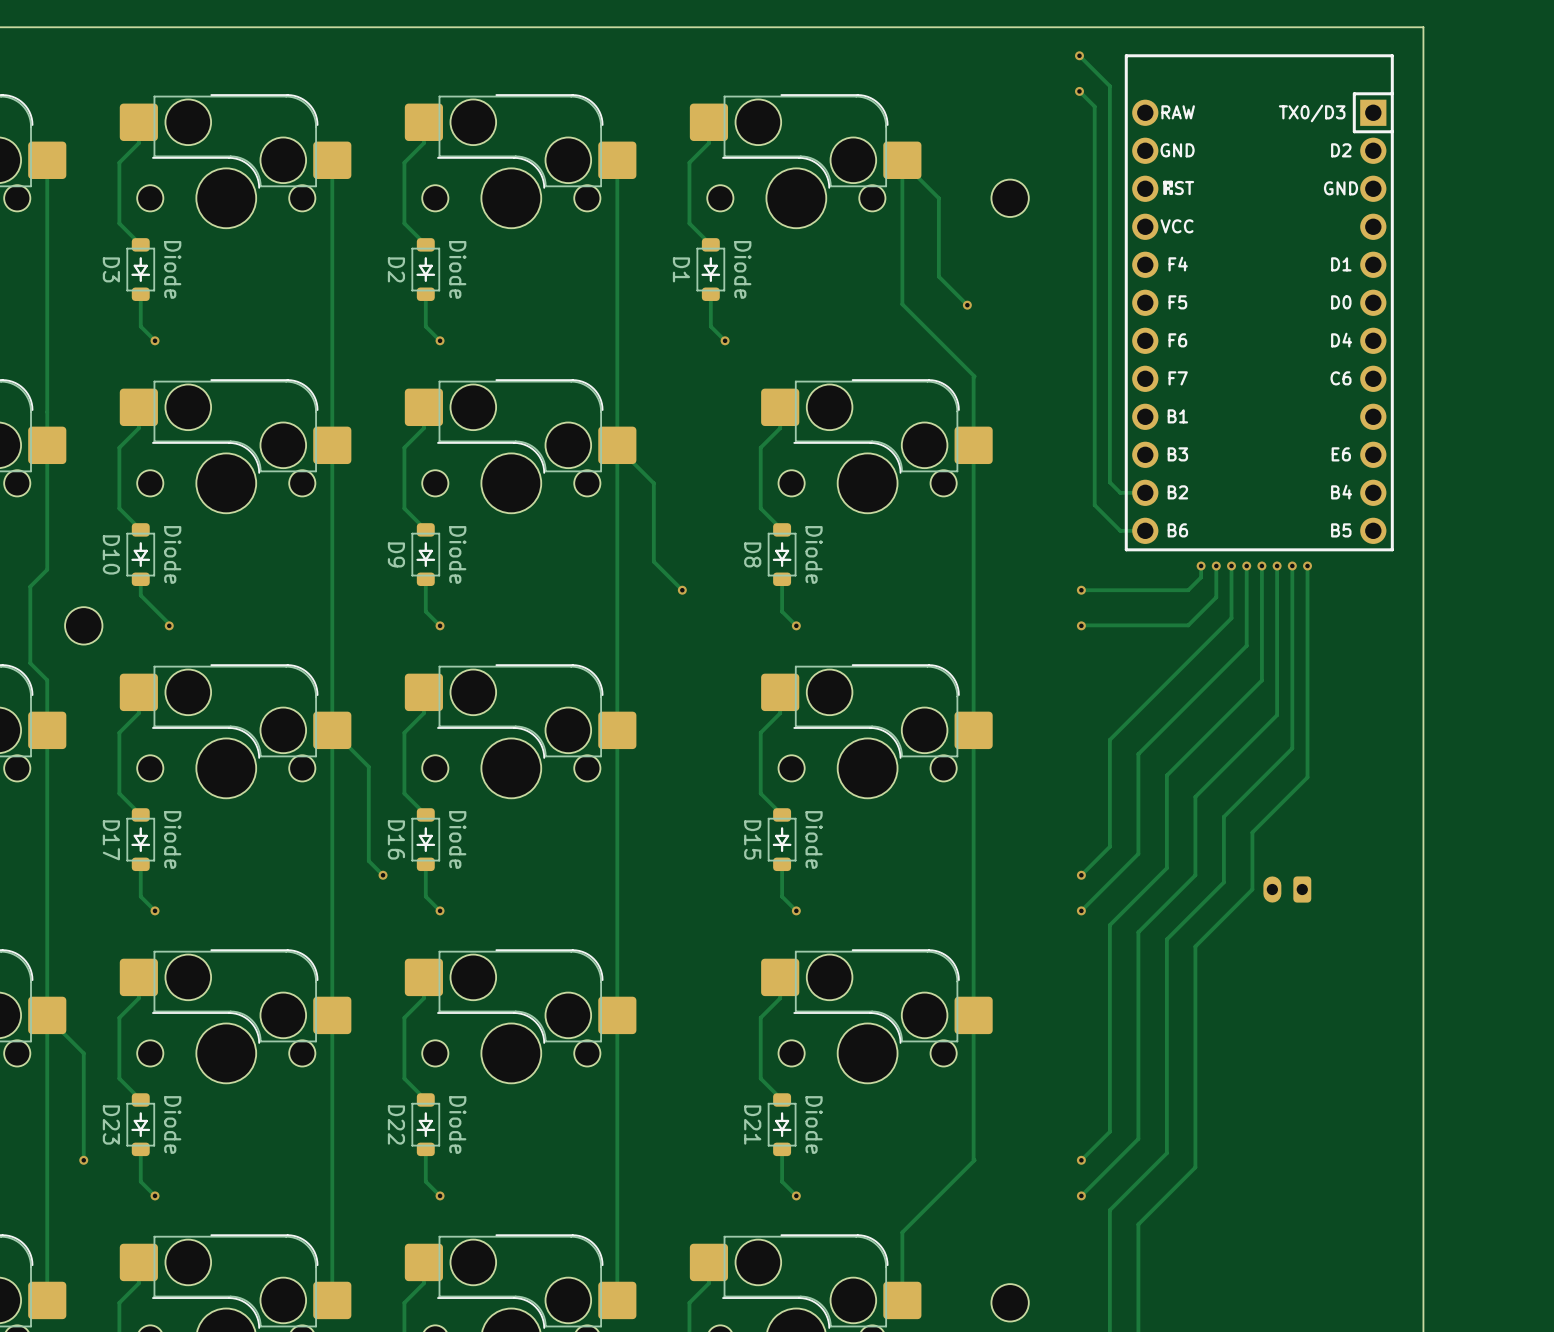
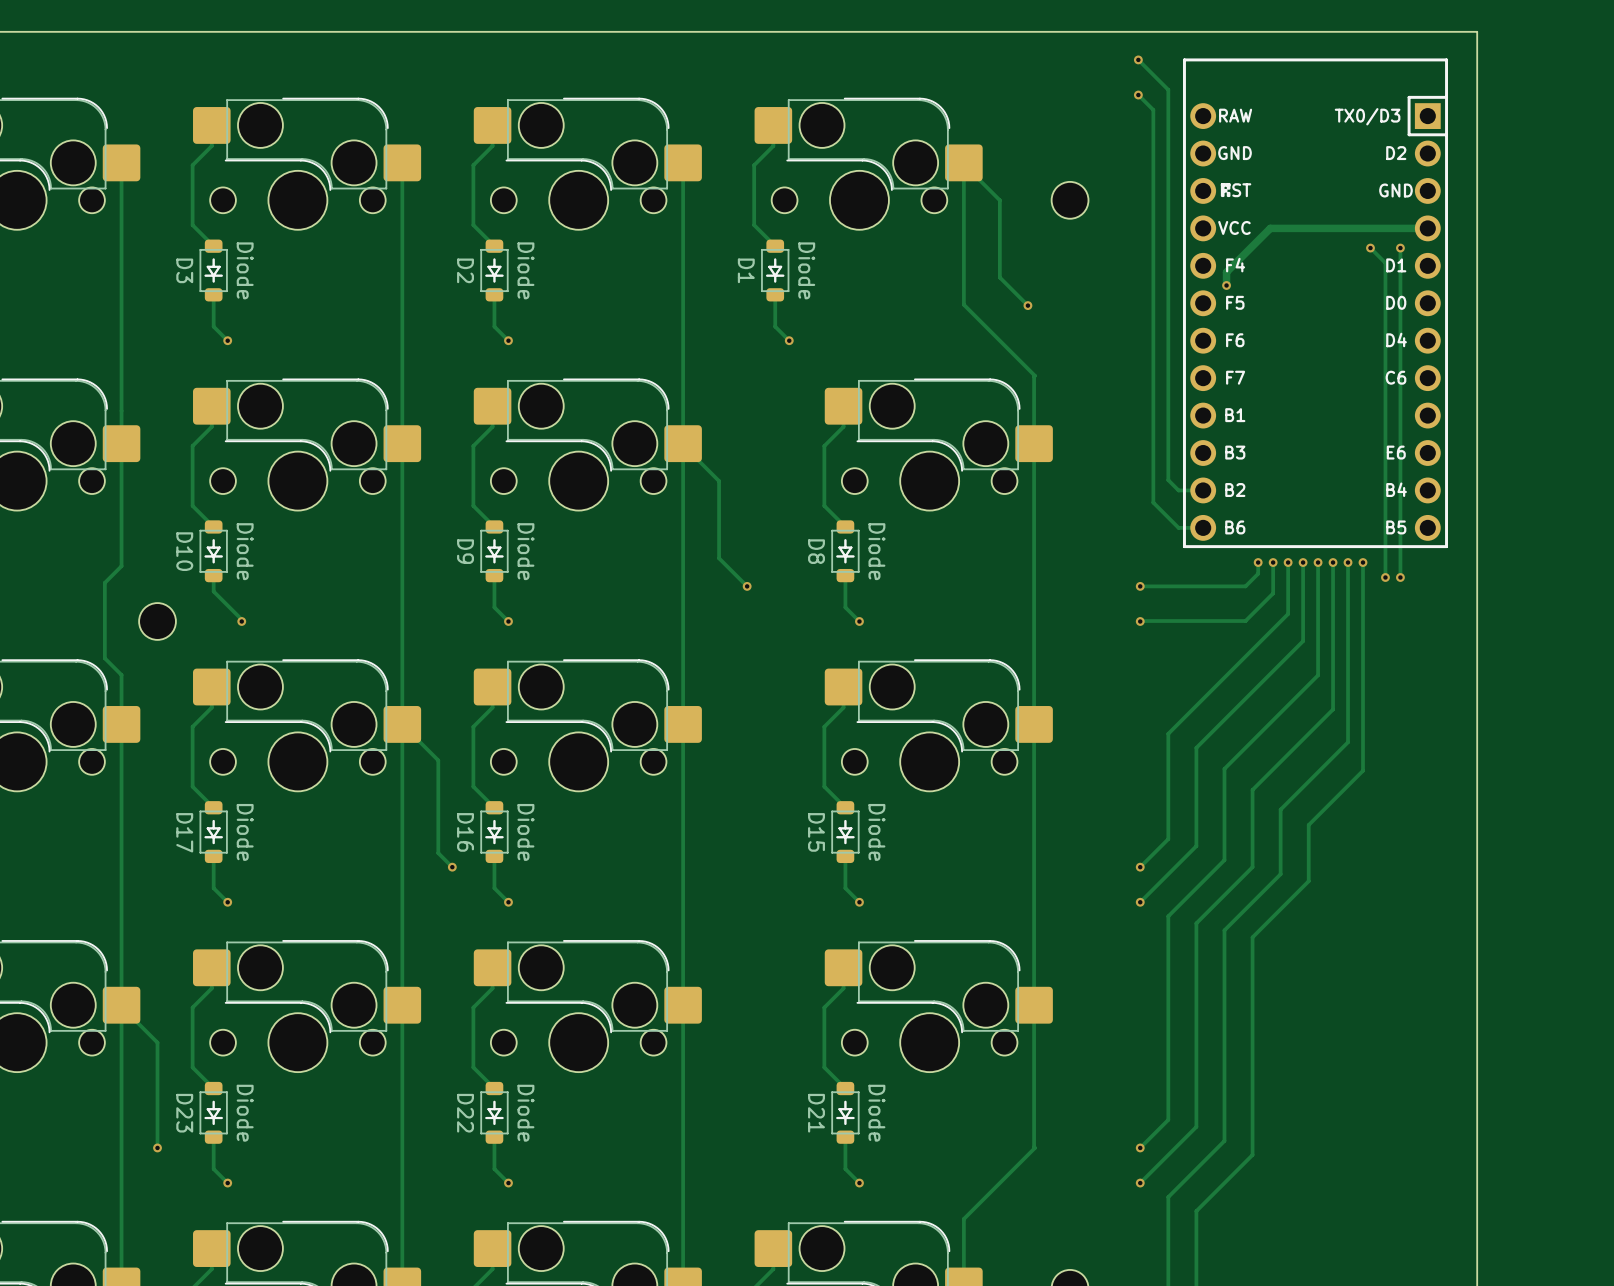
track: none -> (1427, 228) (1270, 228) (1226, 272) (1226, 285)
track: none -> (1370, 248) (1385, 263) (1385, 577)
via: none -> (1370, 248)
track: none -> (1400, 248) (1400, 577)
via: none -> (1400, 248)
via: none -> (1226, 285)
via: none -> (1385, 577)
via: none -> (1400, 577)
part: (1287, 889) -> none

